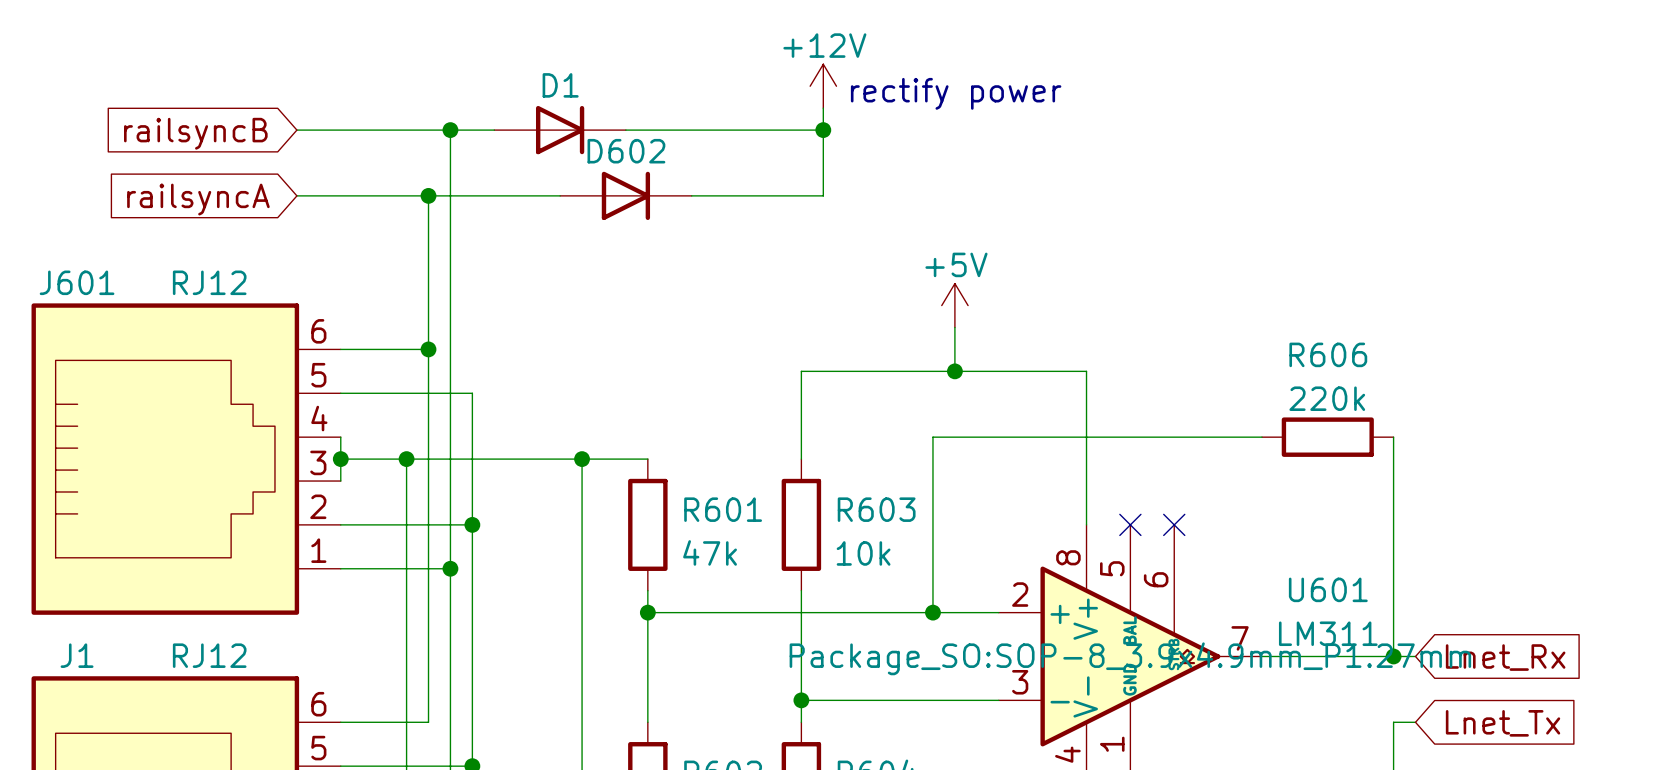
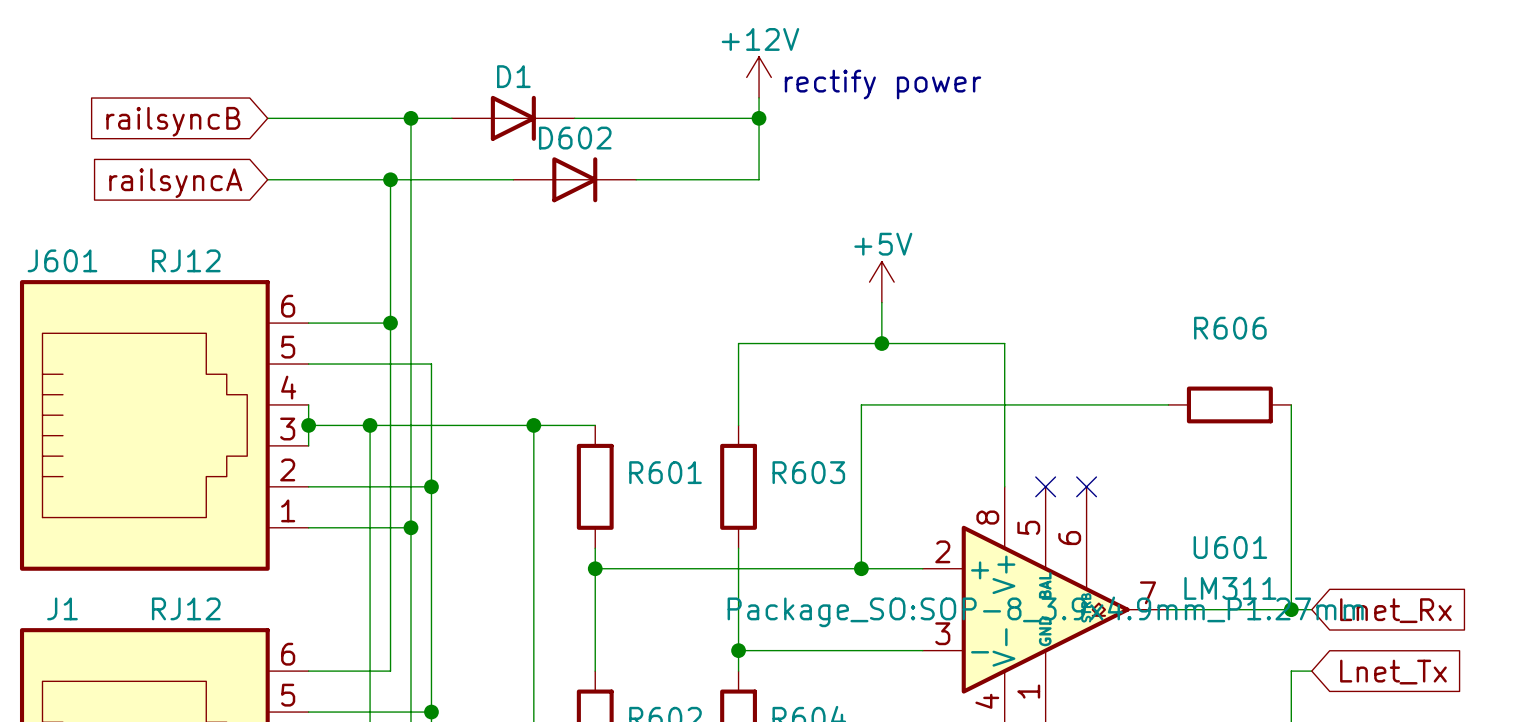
R606 value: 220k (1327, 398) -> none
R601 value: 47k (710, 552) -> none
R603 value: 10k (863, 553) -> none

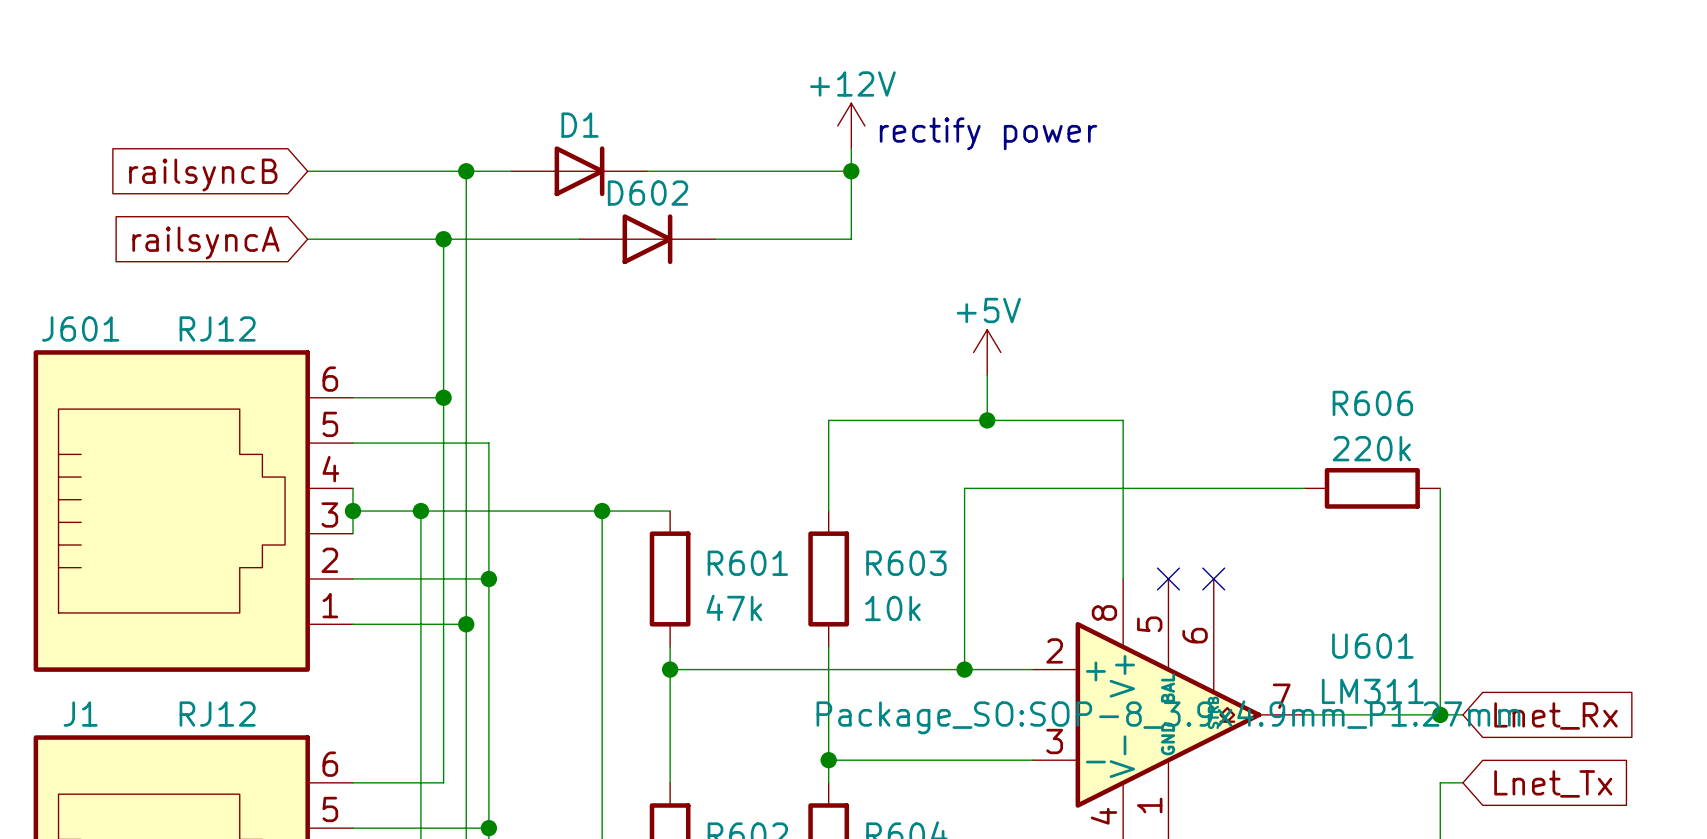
R606 value: none -> 220k (1371, 448)
R601 value: none -> 47k (734, 607)
R603 value: none -> 10k (892, 608)

